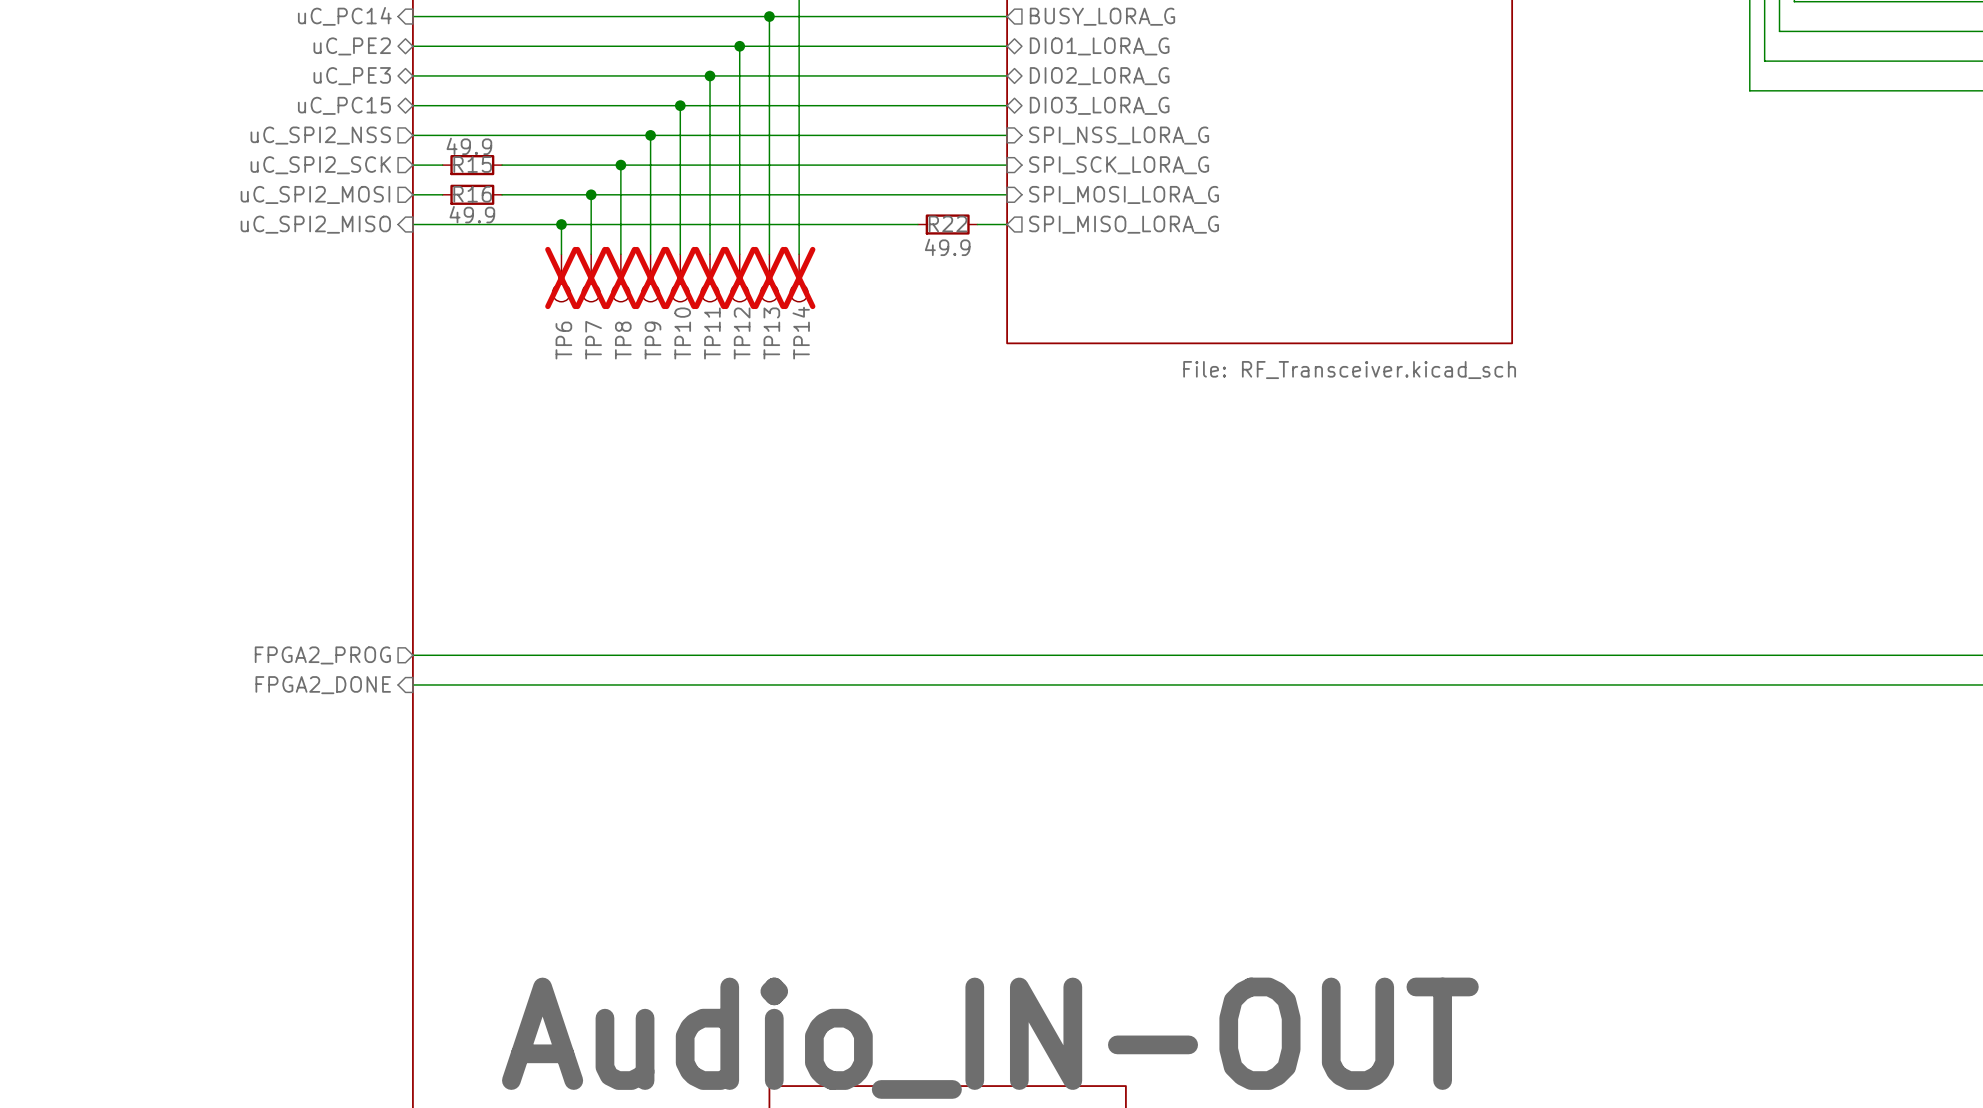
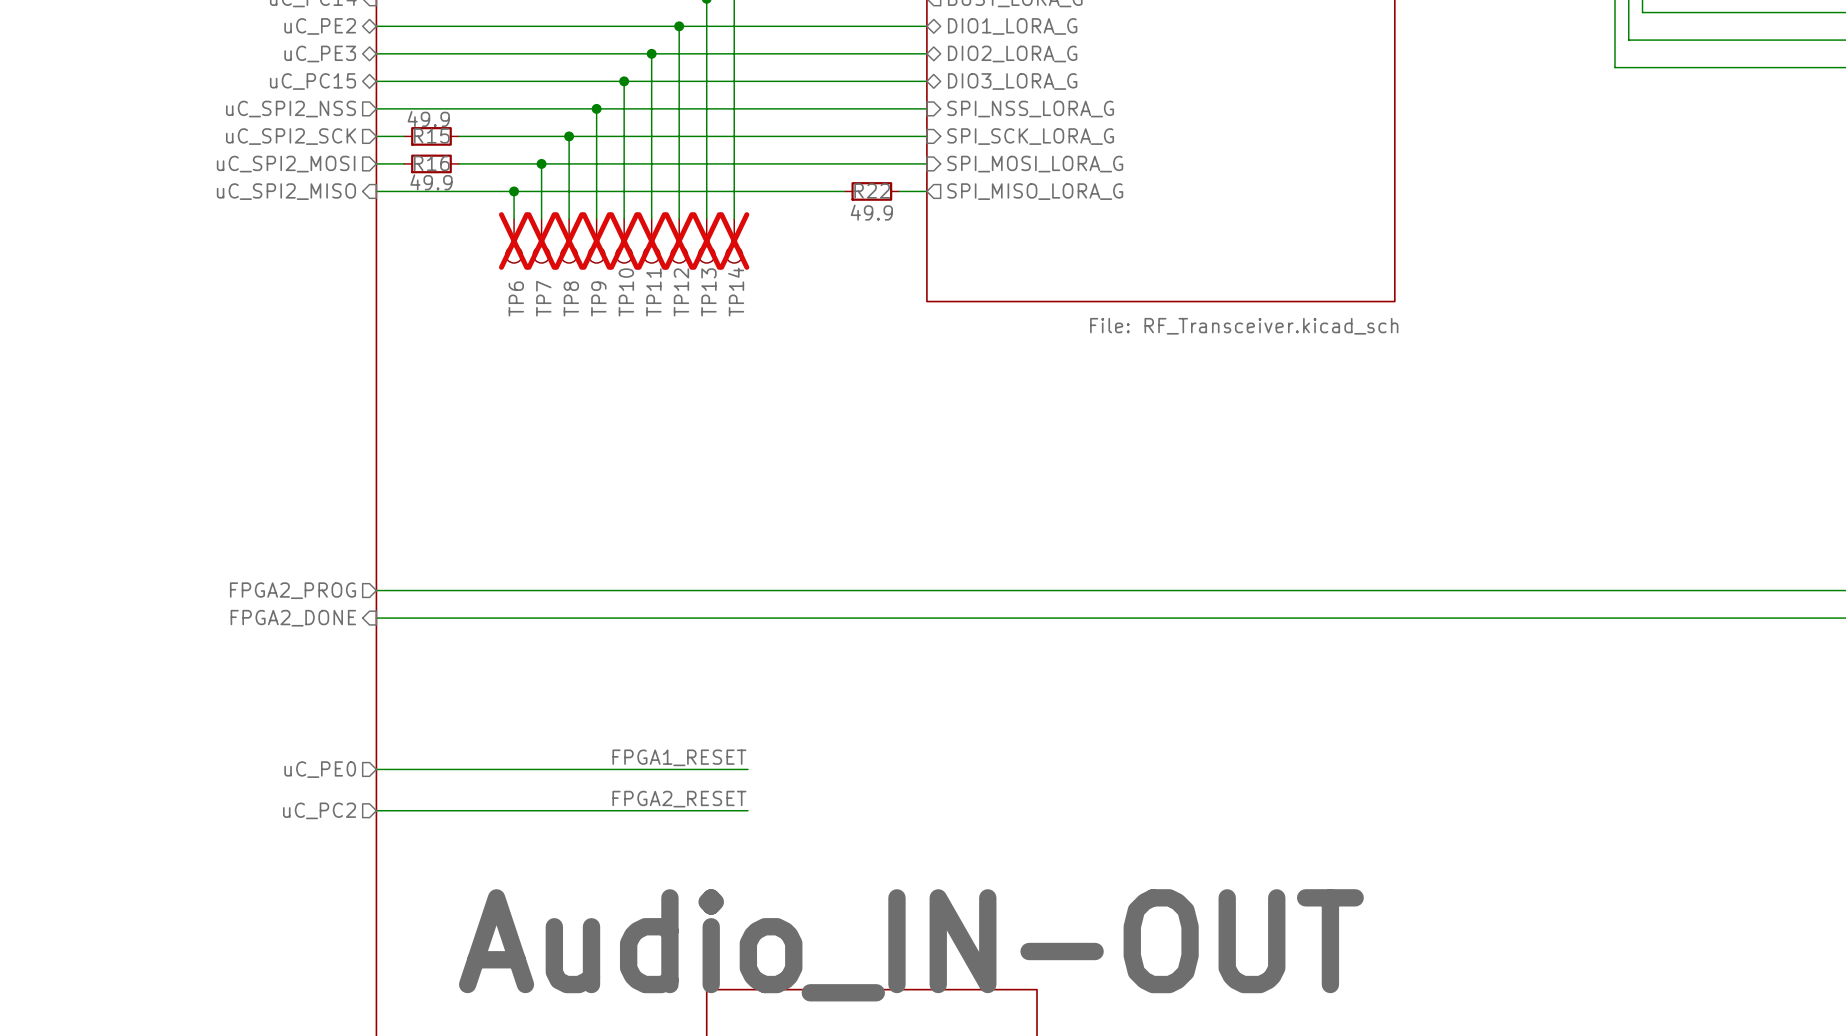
label: none -> FPGA1_RESET (679, 757)
sheet pin: none -> uC_PE0 (320, 769)
wire: none -> (376, 769) (748, 769)
label: none -> FPGA2_RESET (679, 799)
wire: none -> (376, 810) (748, 810)
sheet pin: none -> uC_PC2 (319, 810)

